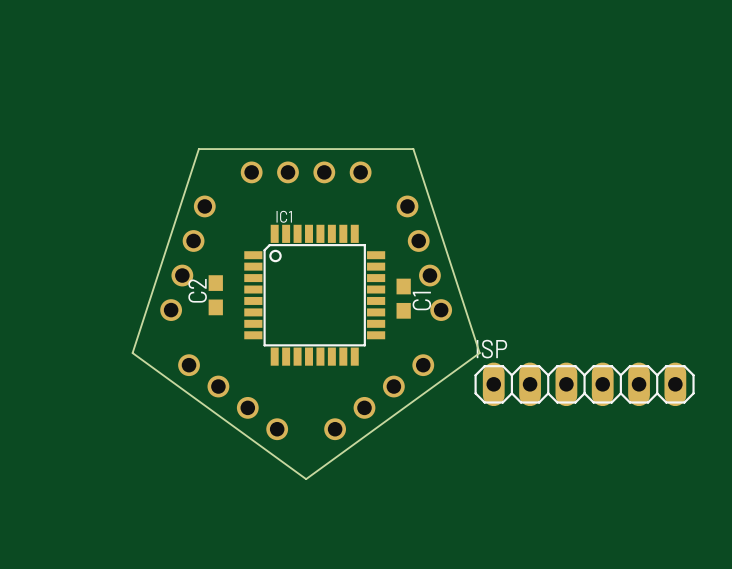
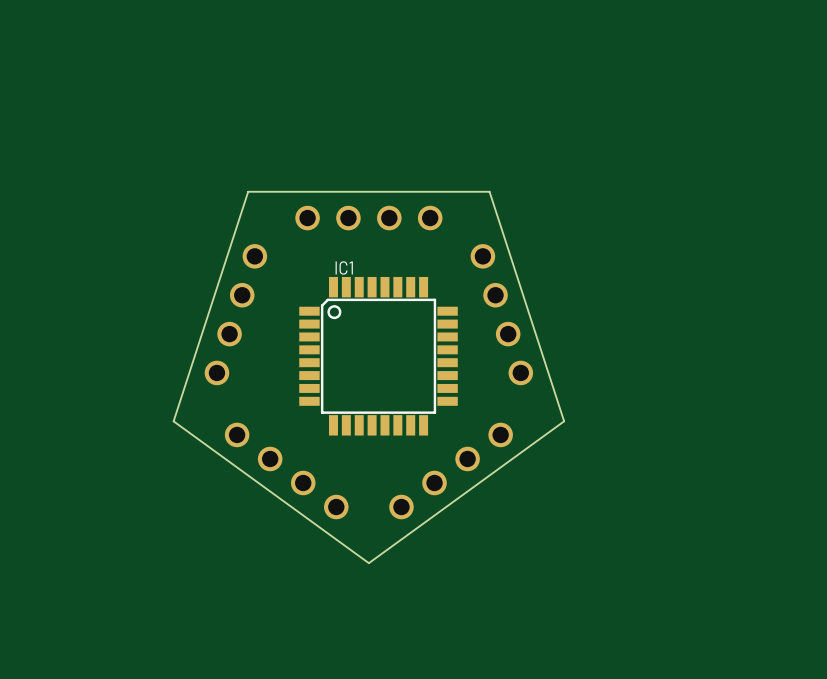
C2: (215, 295) -> none
C1: (403, 298) -> none
ISP: (584, 384) -> none

